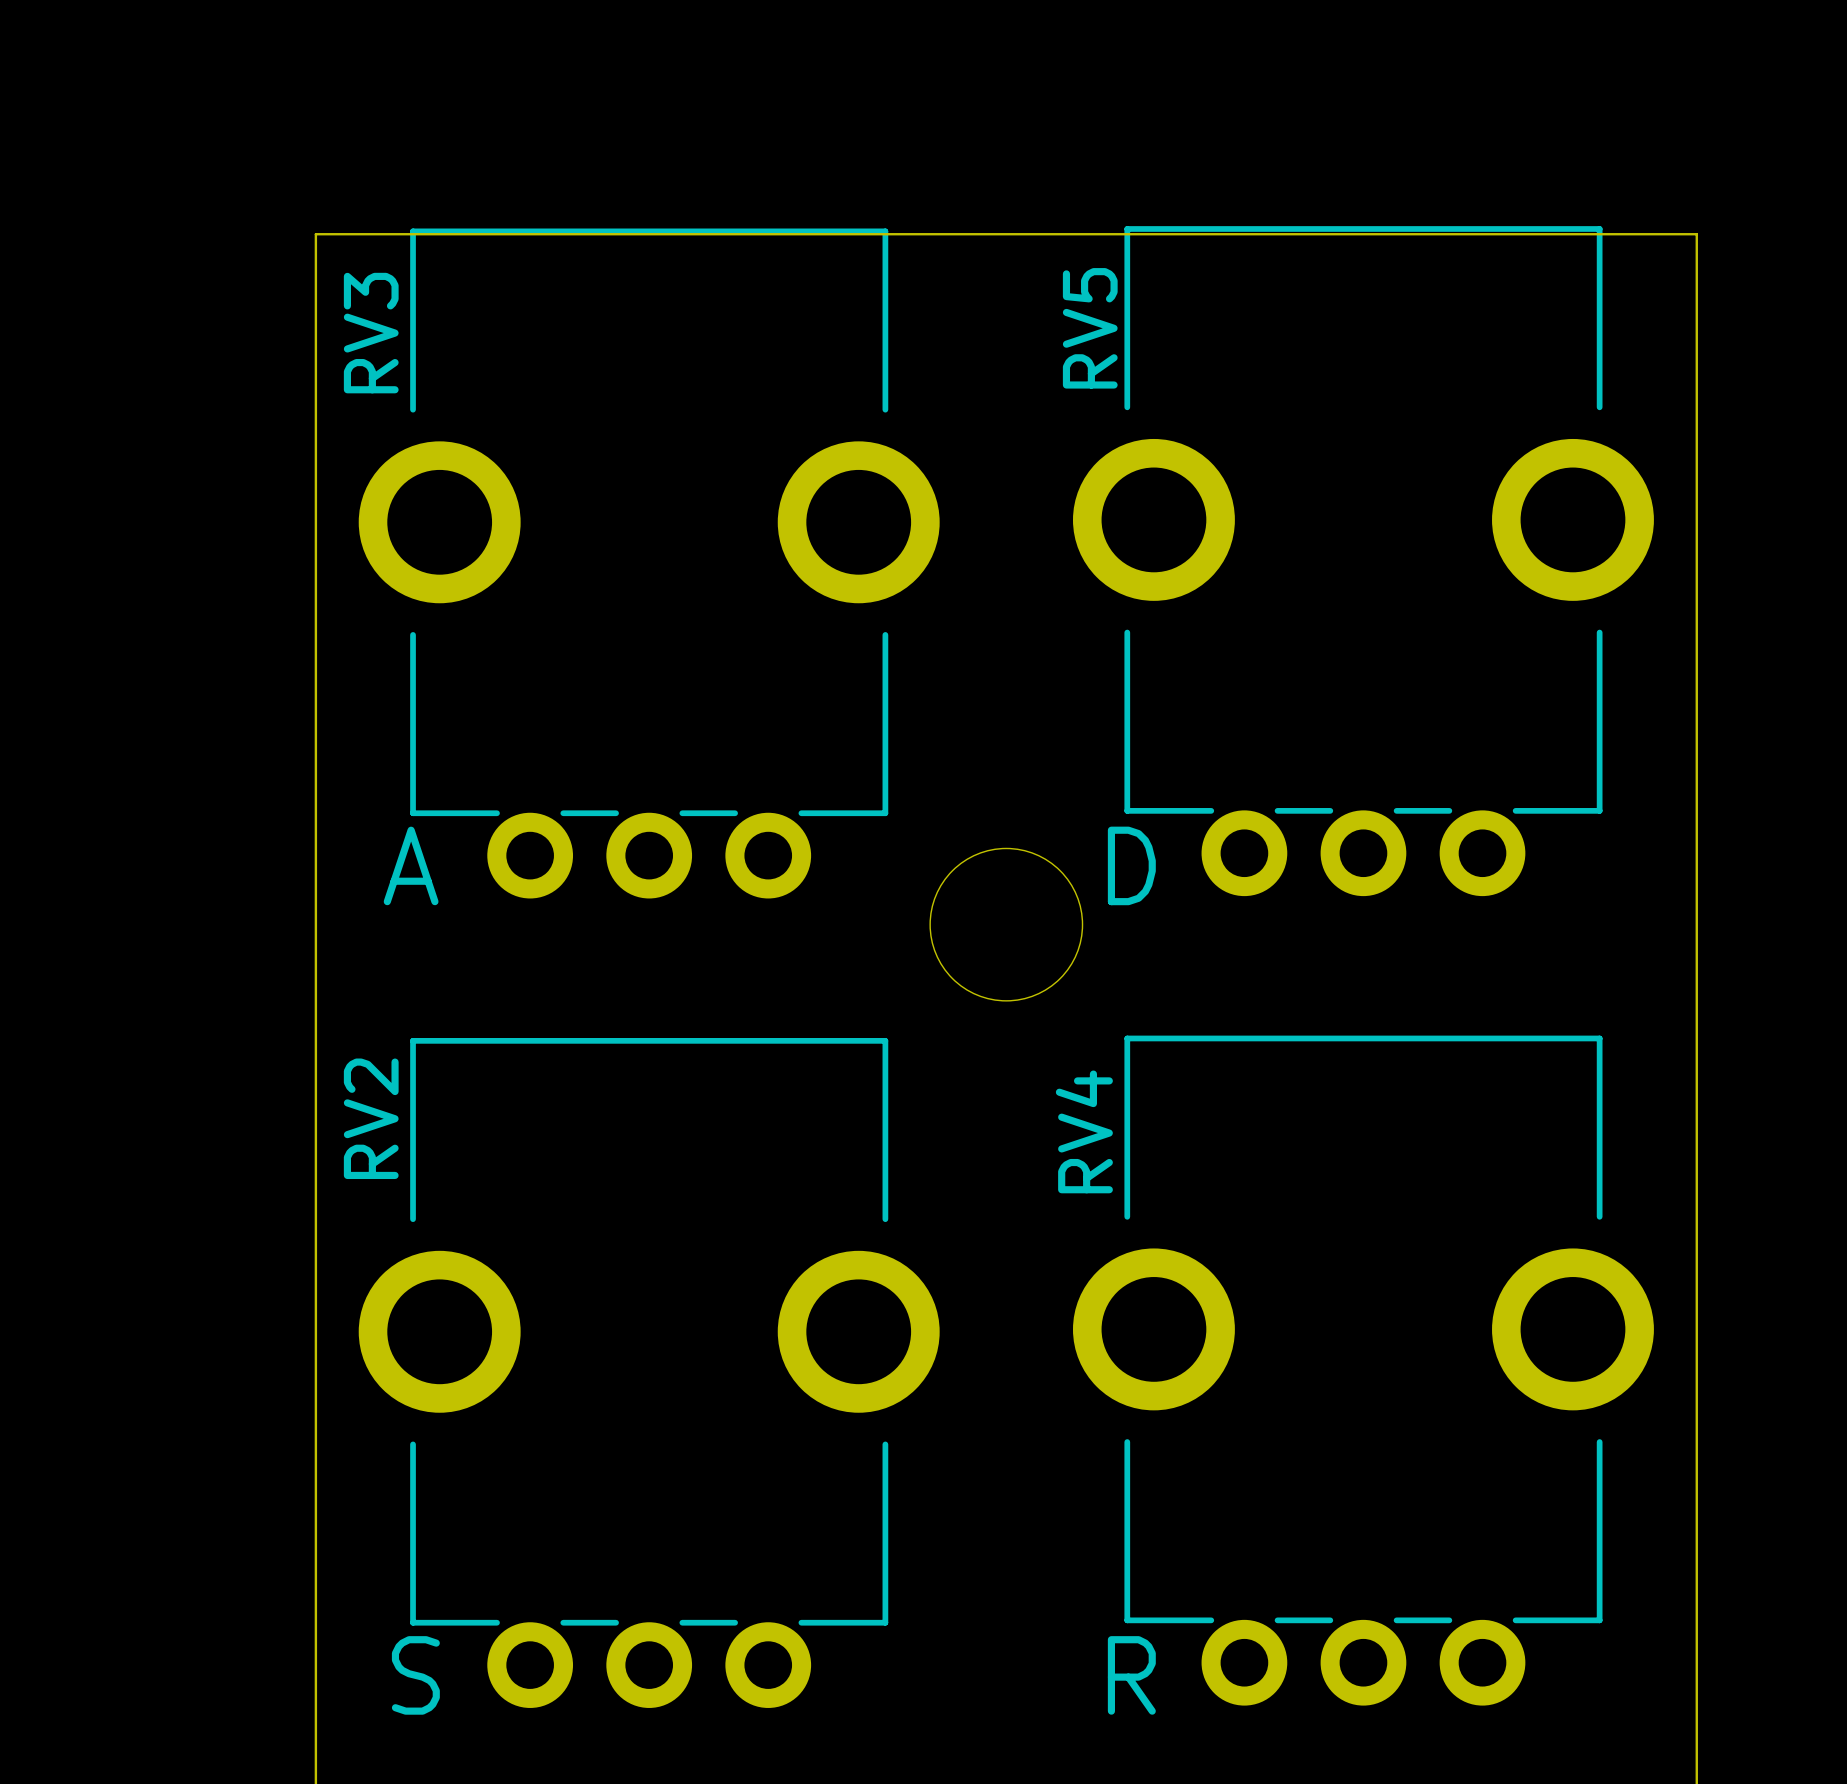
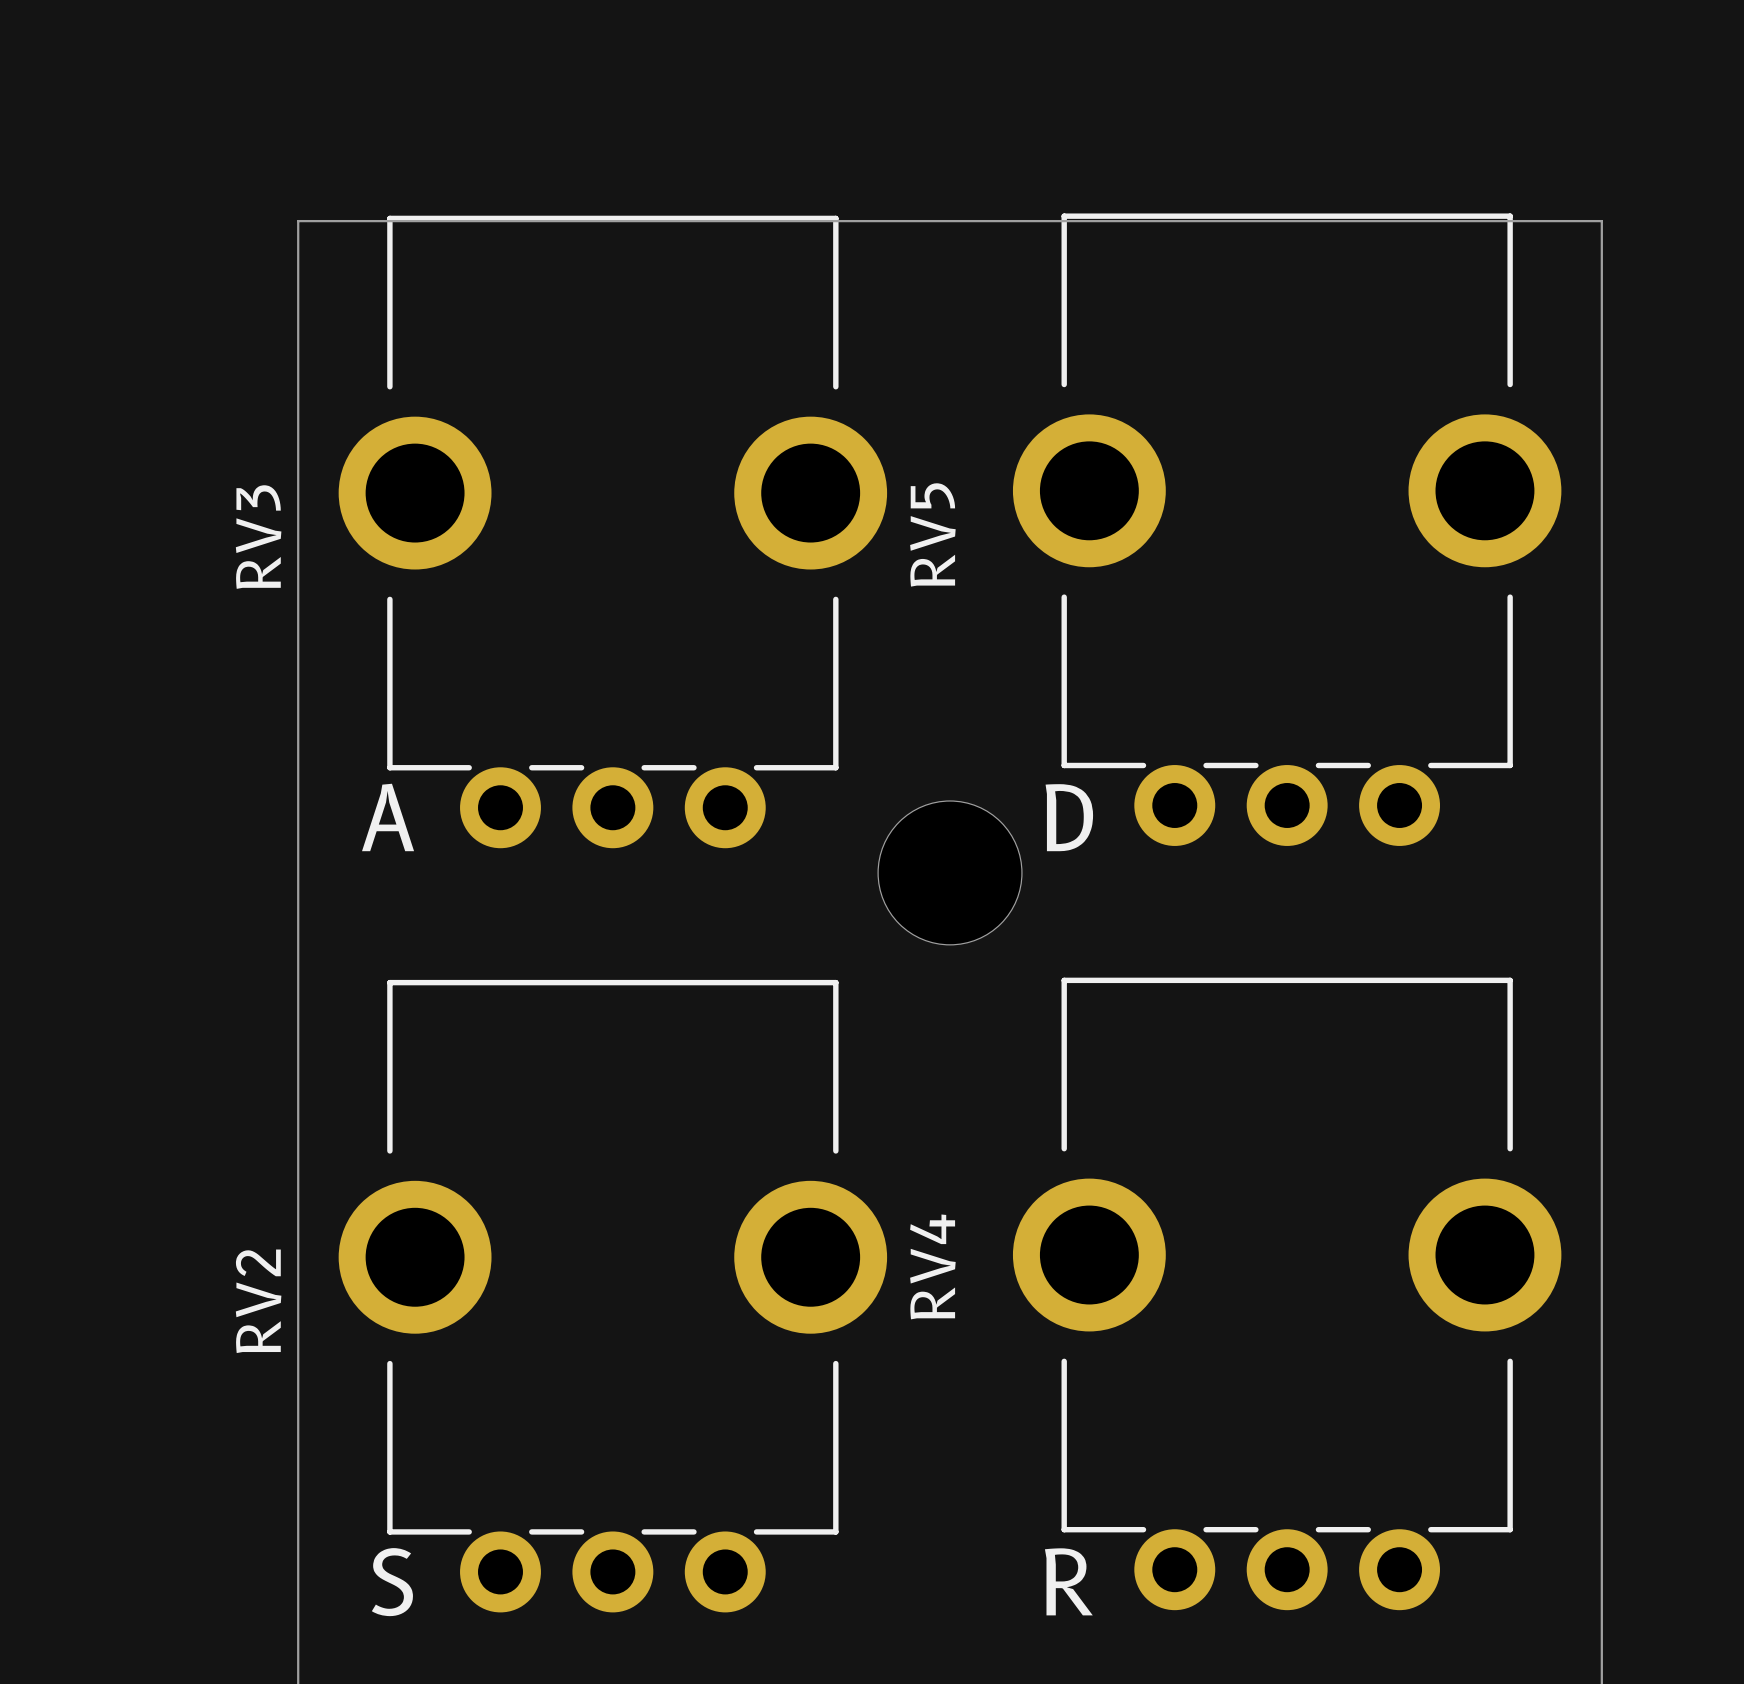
RV5 name position: RV5 (1090, 328) -> RV5 (932, 534)
RV3 name position: RV3 (371, 333) -> RV3 (258, 537)
RV2 name position: RV2 (371, 1118) -> RV2 (258, 1301)
RV4 name position: RV4 (1084, 1131) -> RV4 (932, 1266)

